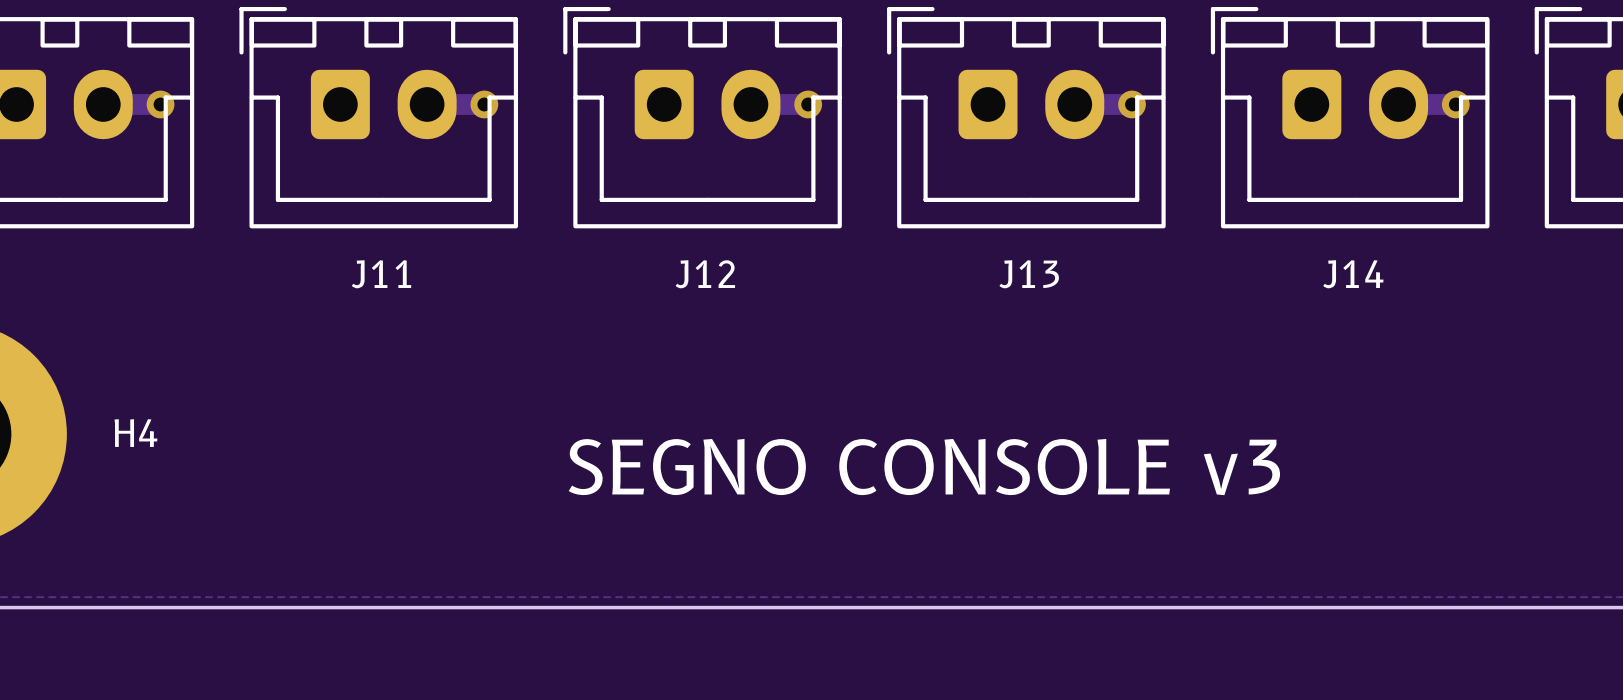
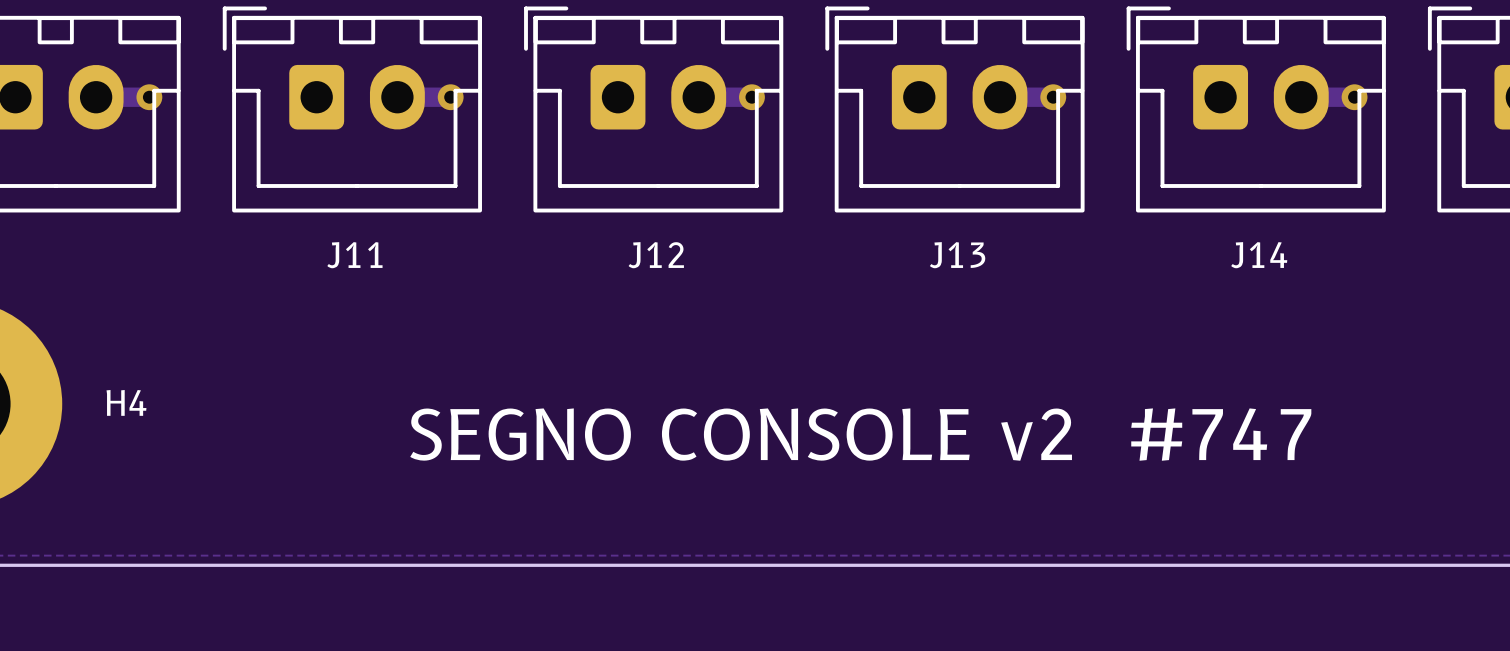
text: SEGNO CONSOLE v3 (924, 467) -> SEGNO CONSOLE v2 #747 (860, 434)

